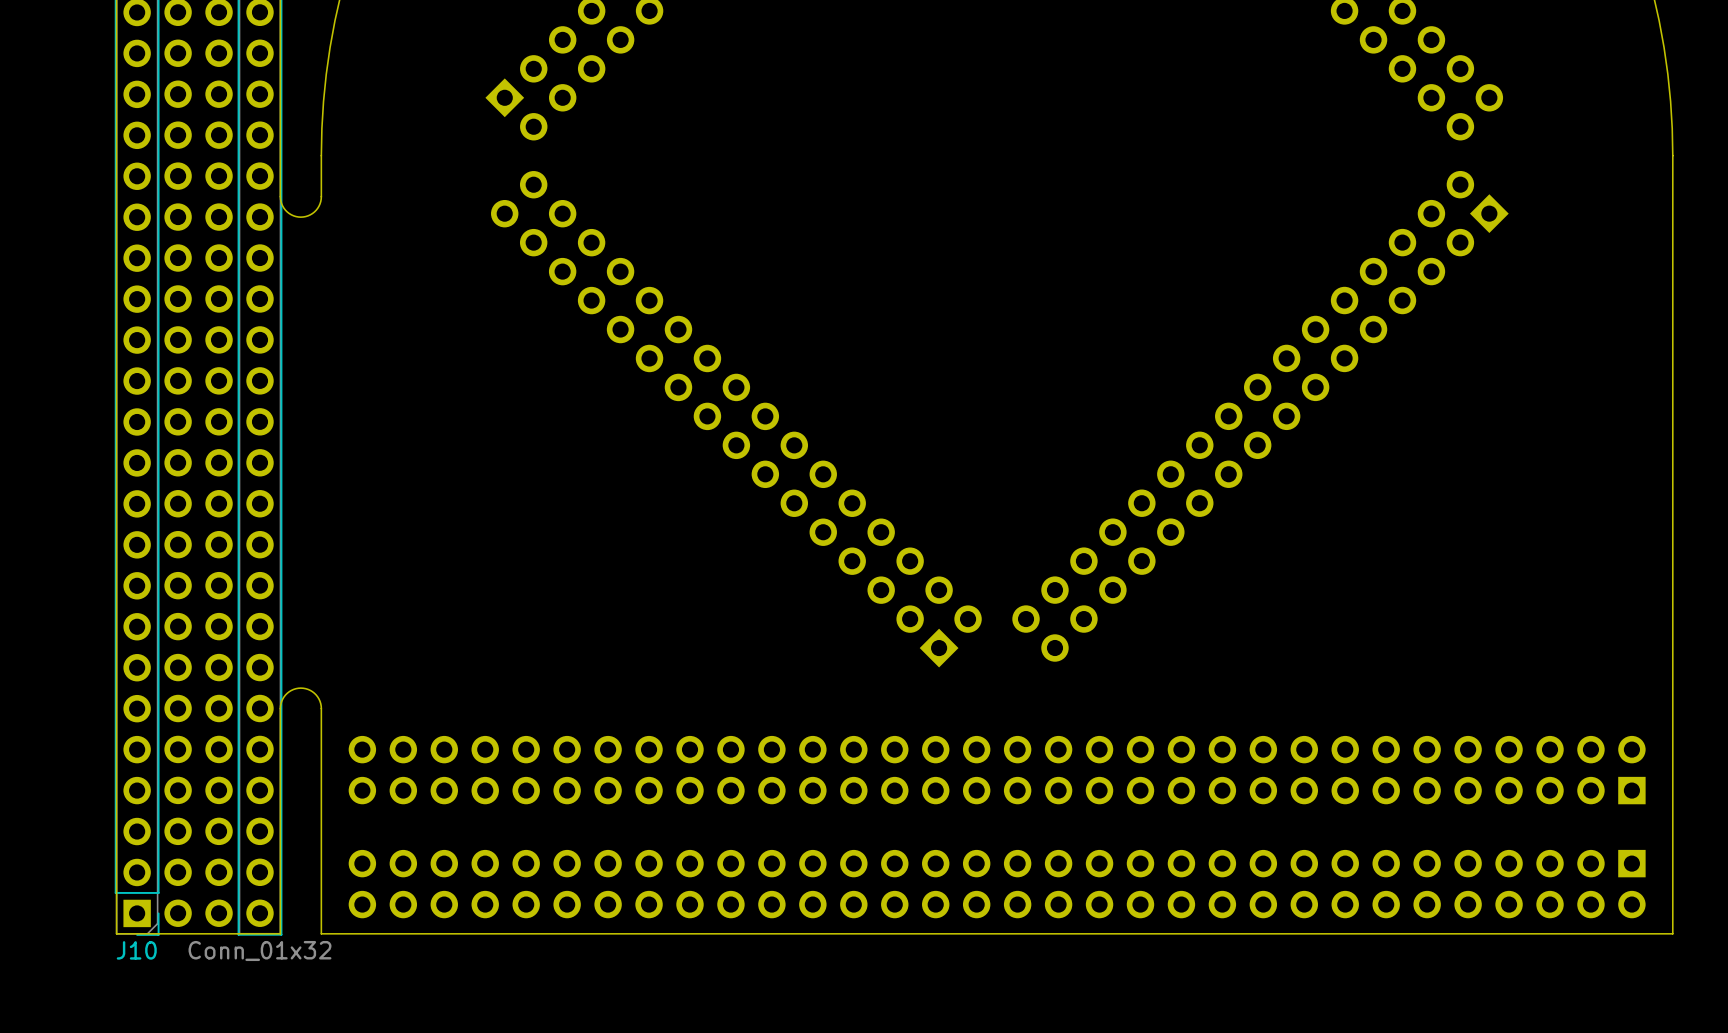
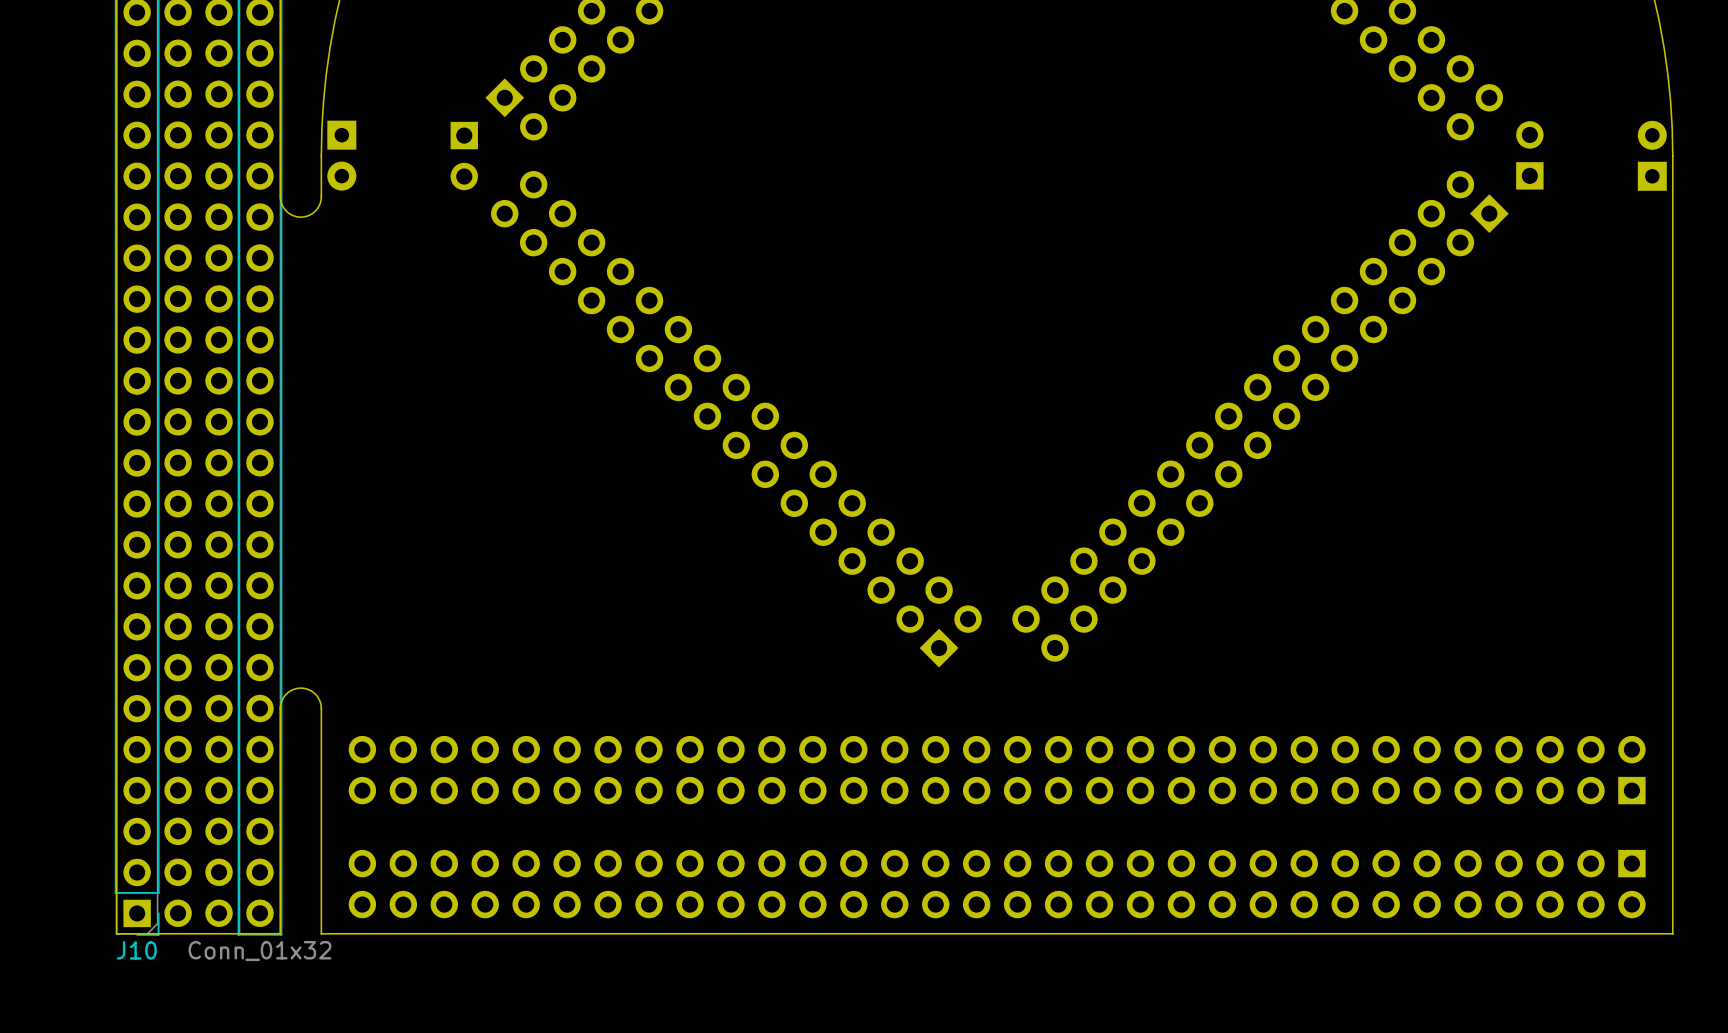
part: none -> (341, 155)
part: none -> (1529, 155)
part: none -> (1652, 155)
part: none -> (464, 156)

